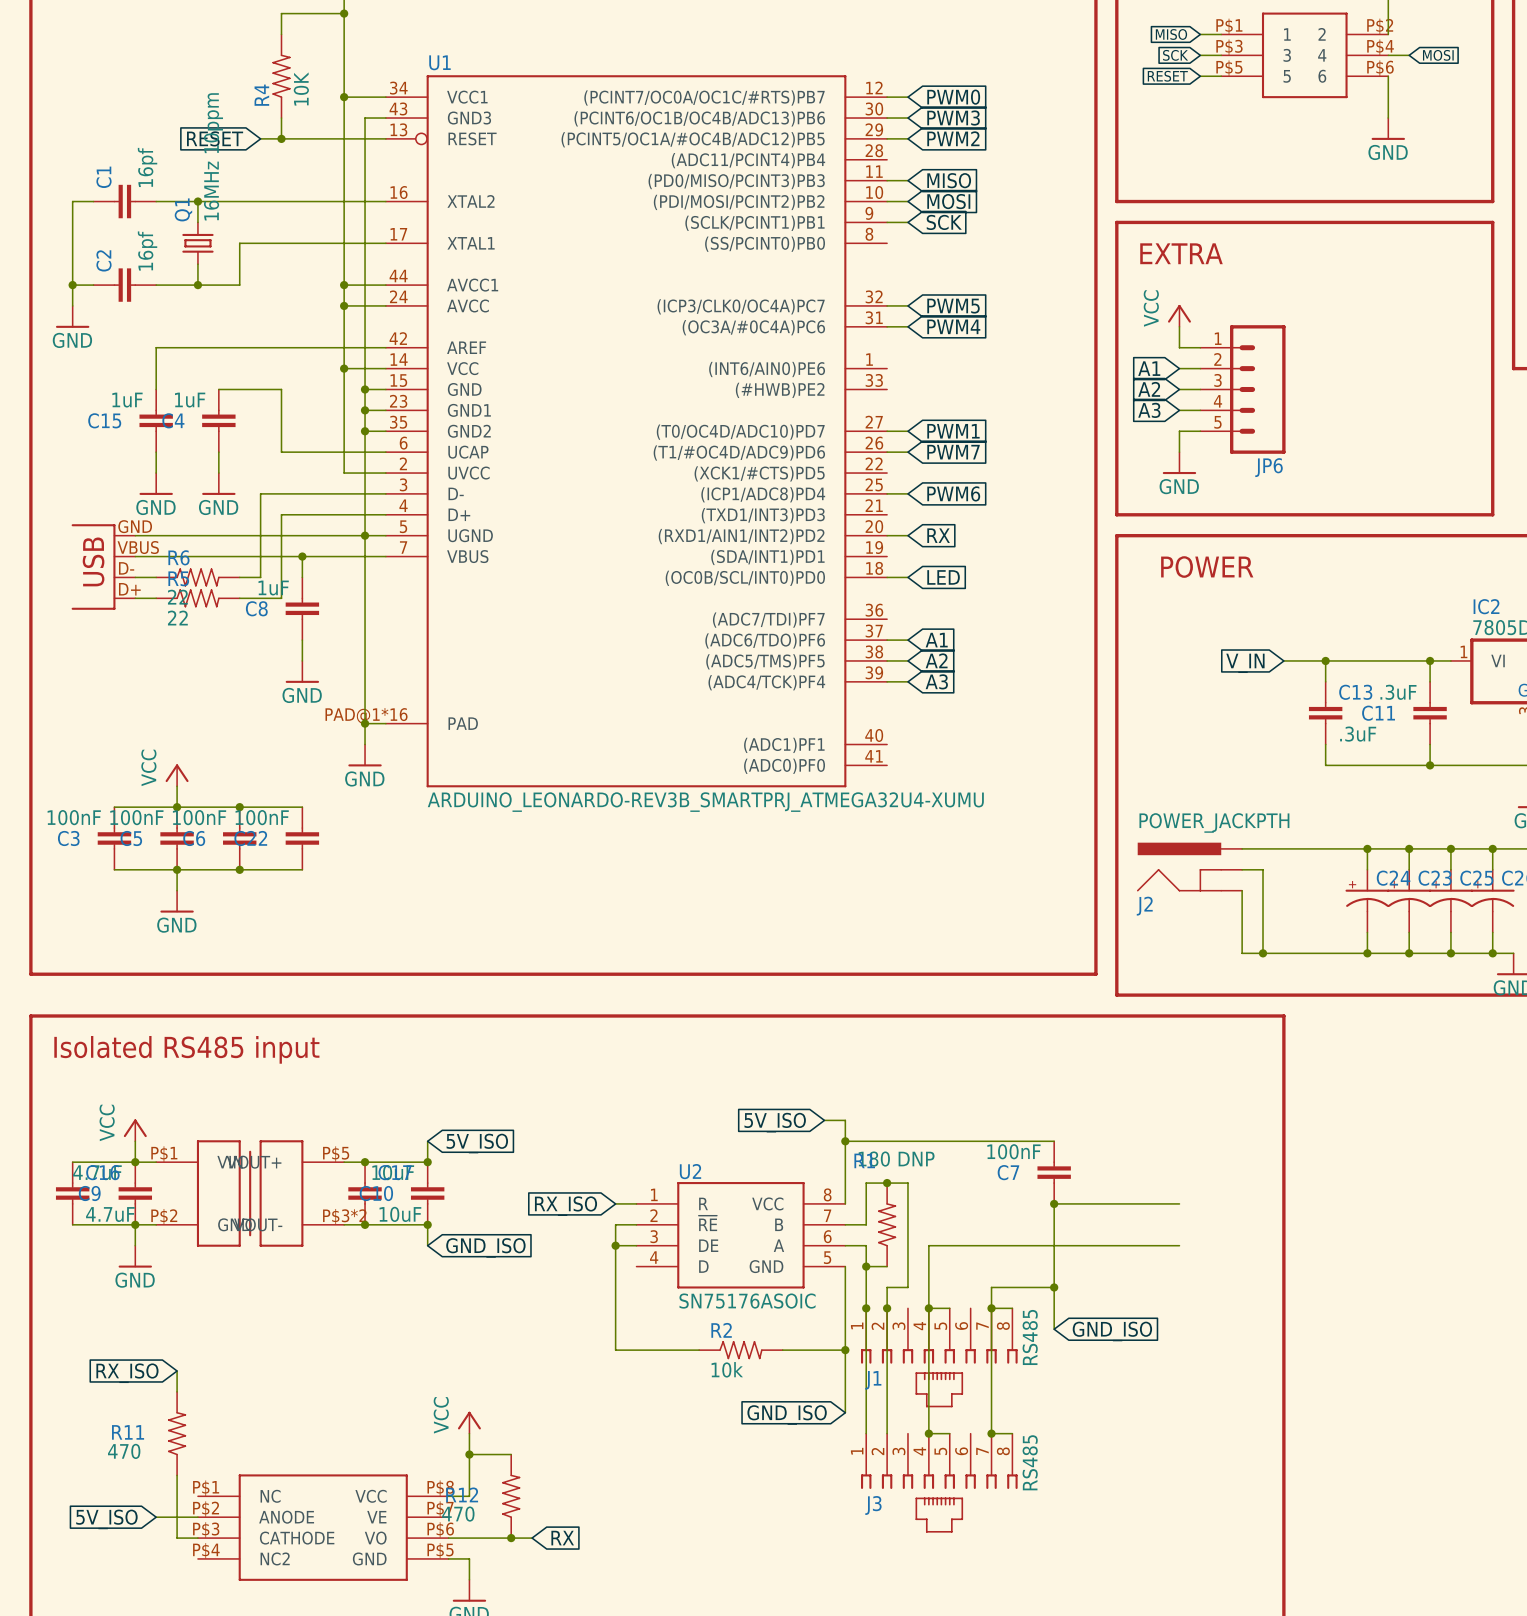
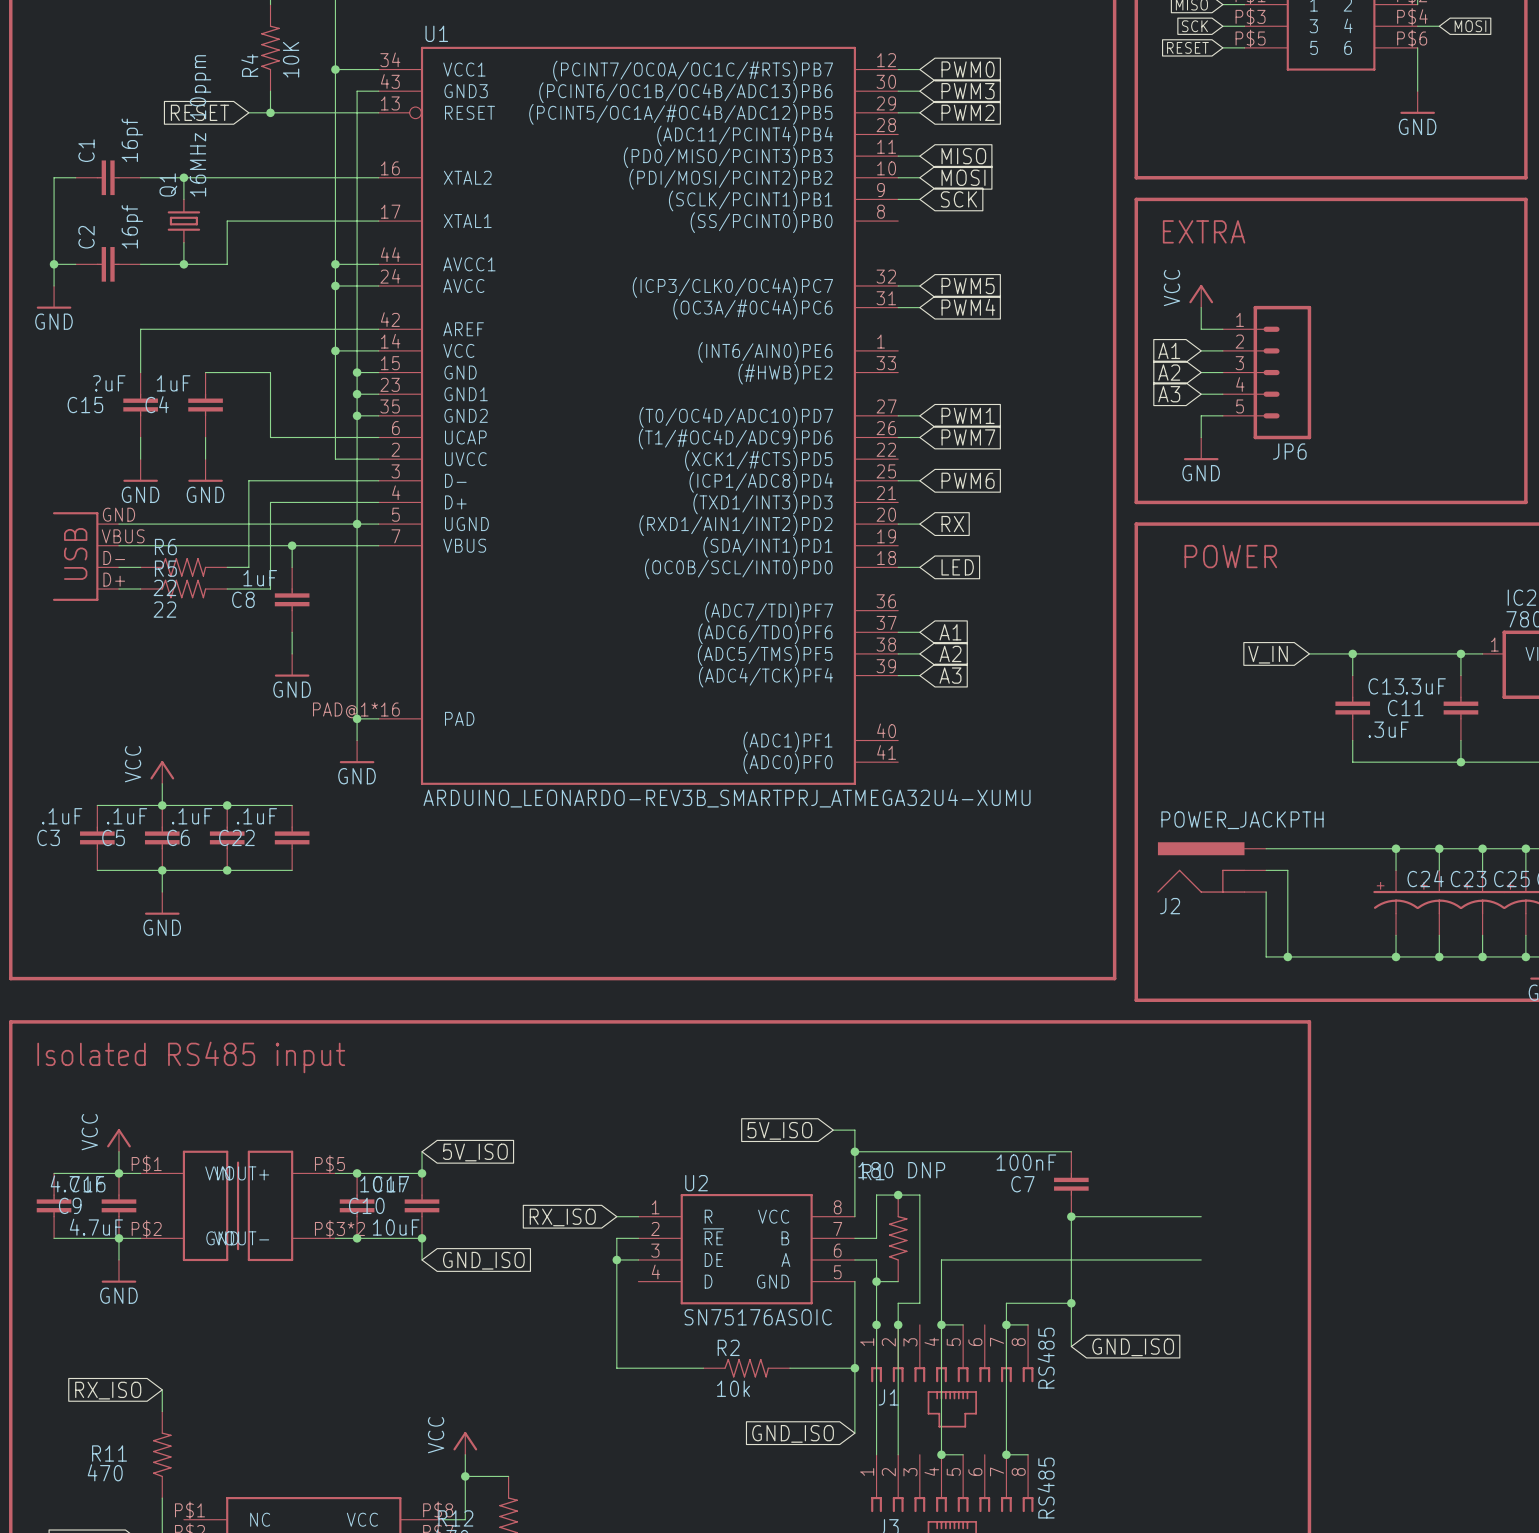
C15 value: 1uF (127, 400) -> ?uF (109, 383)
C3 value: 100nF (74, 817) -> .1uF (62, 816)
C5 value: 100nF (136, 817) -> .1uF (127, 816)
C6 value: 100nF (199, 817) -> .1uF (192, 816)
C22 value: 100nF (262, 817) -> .1uF (256, 816)

